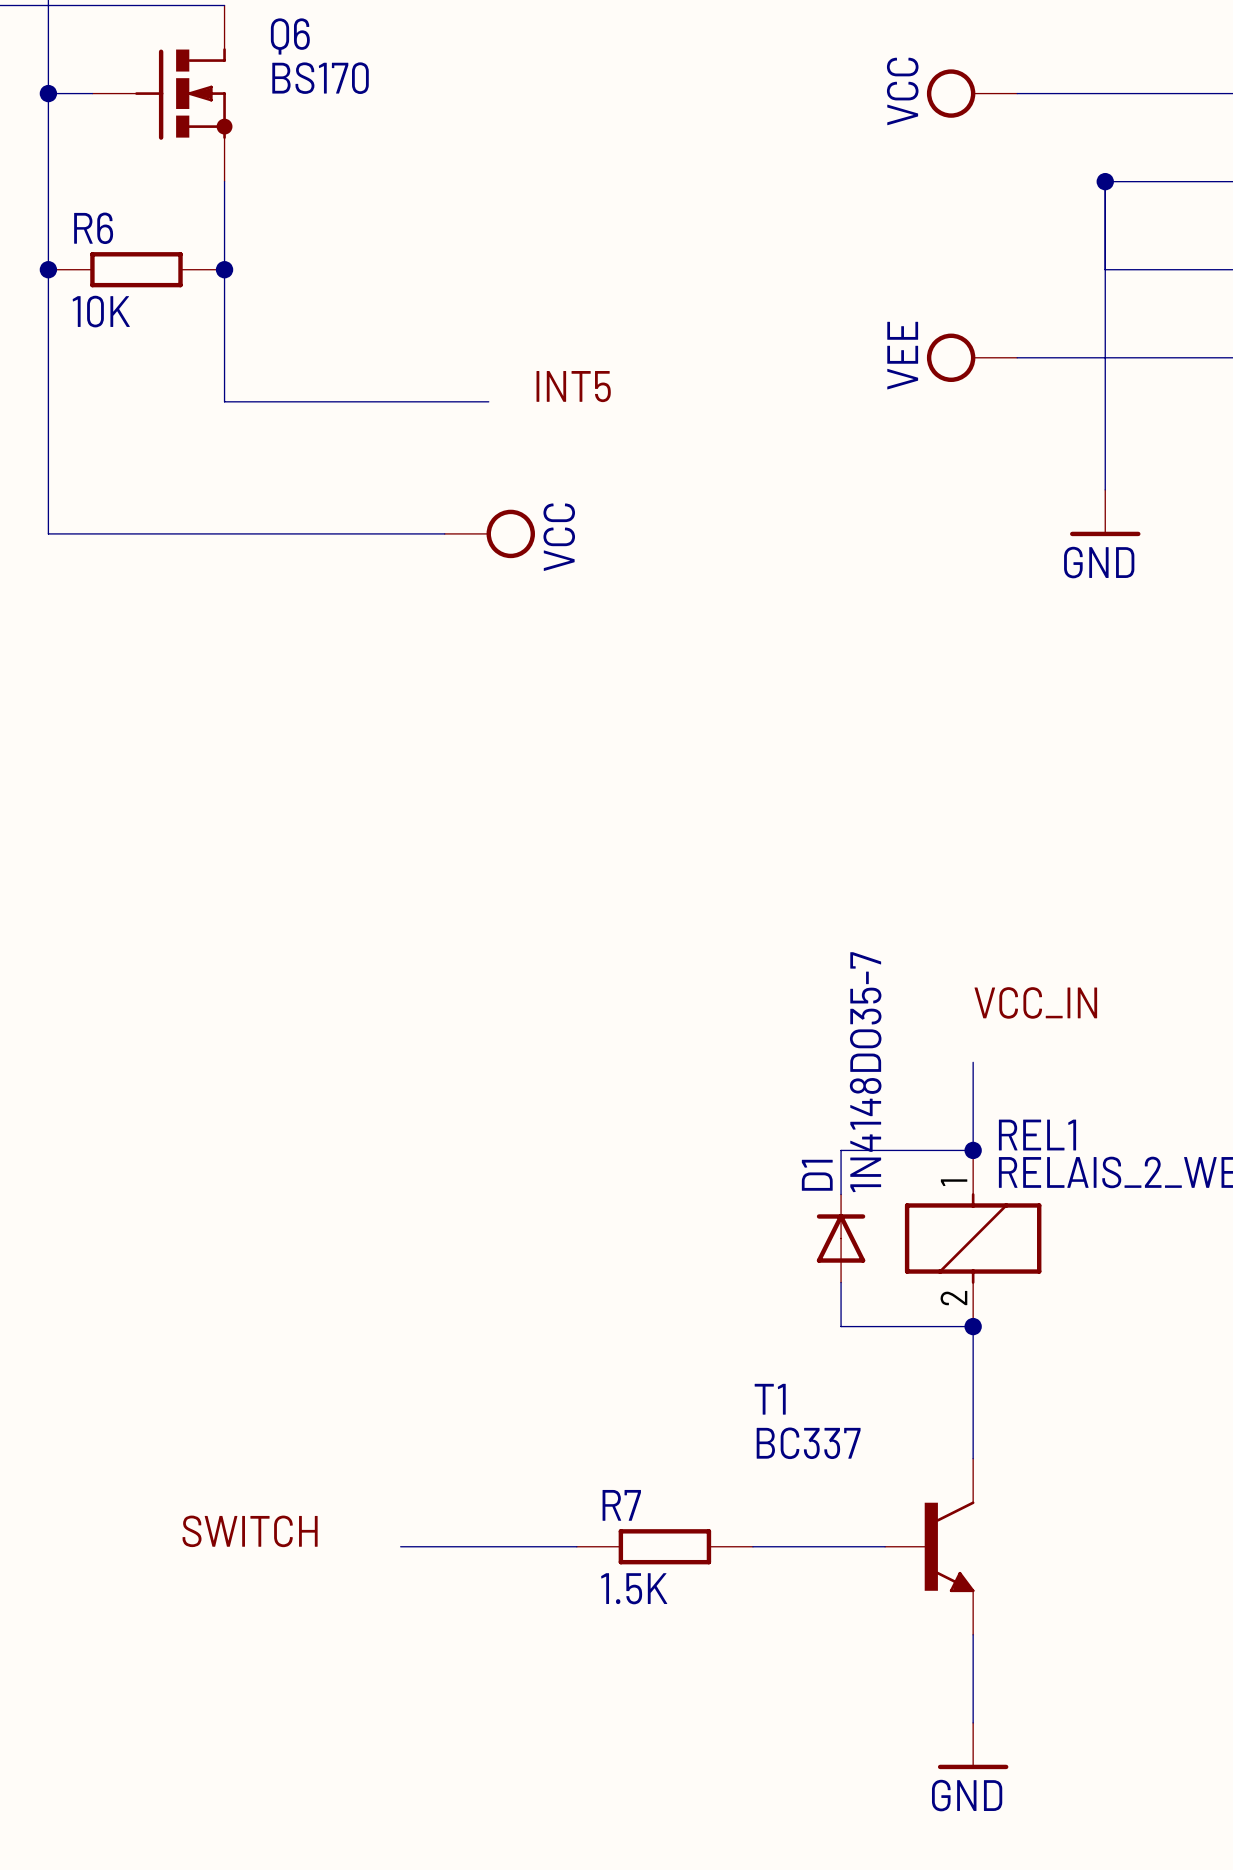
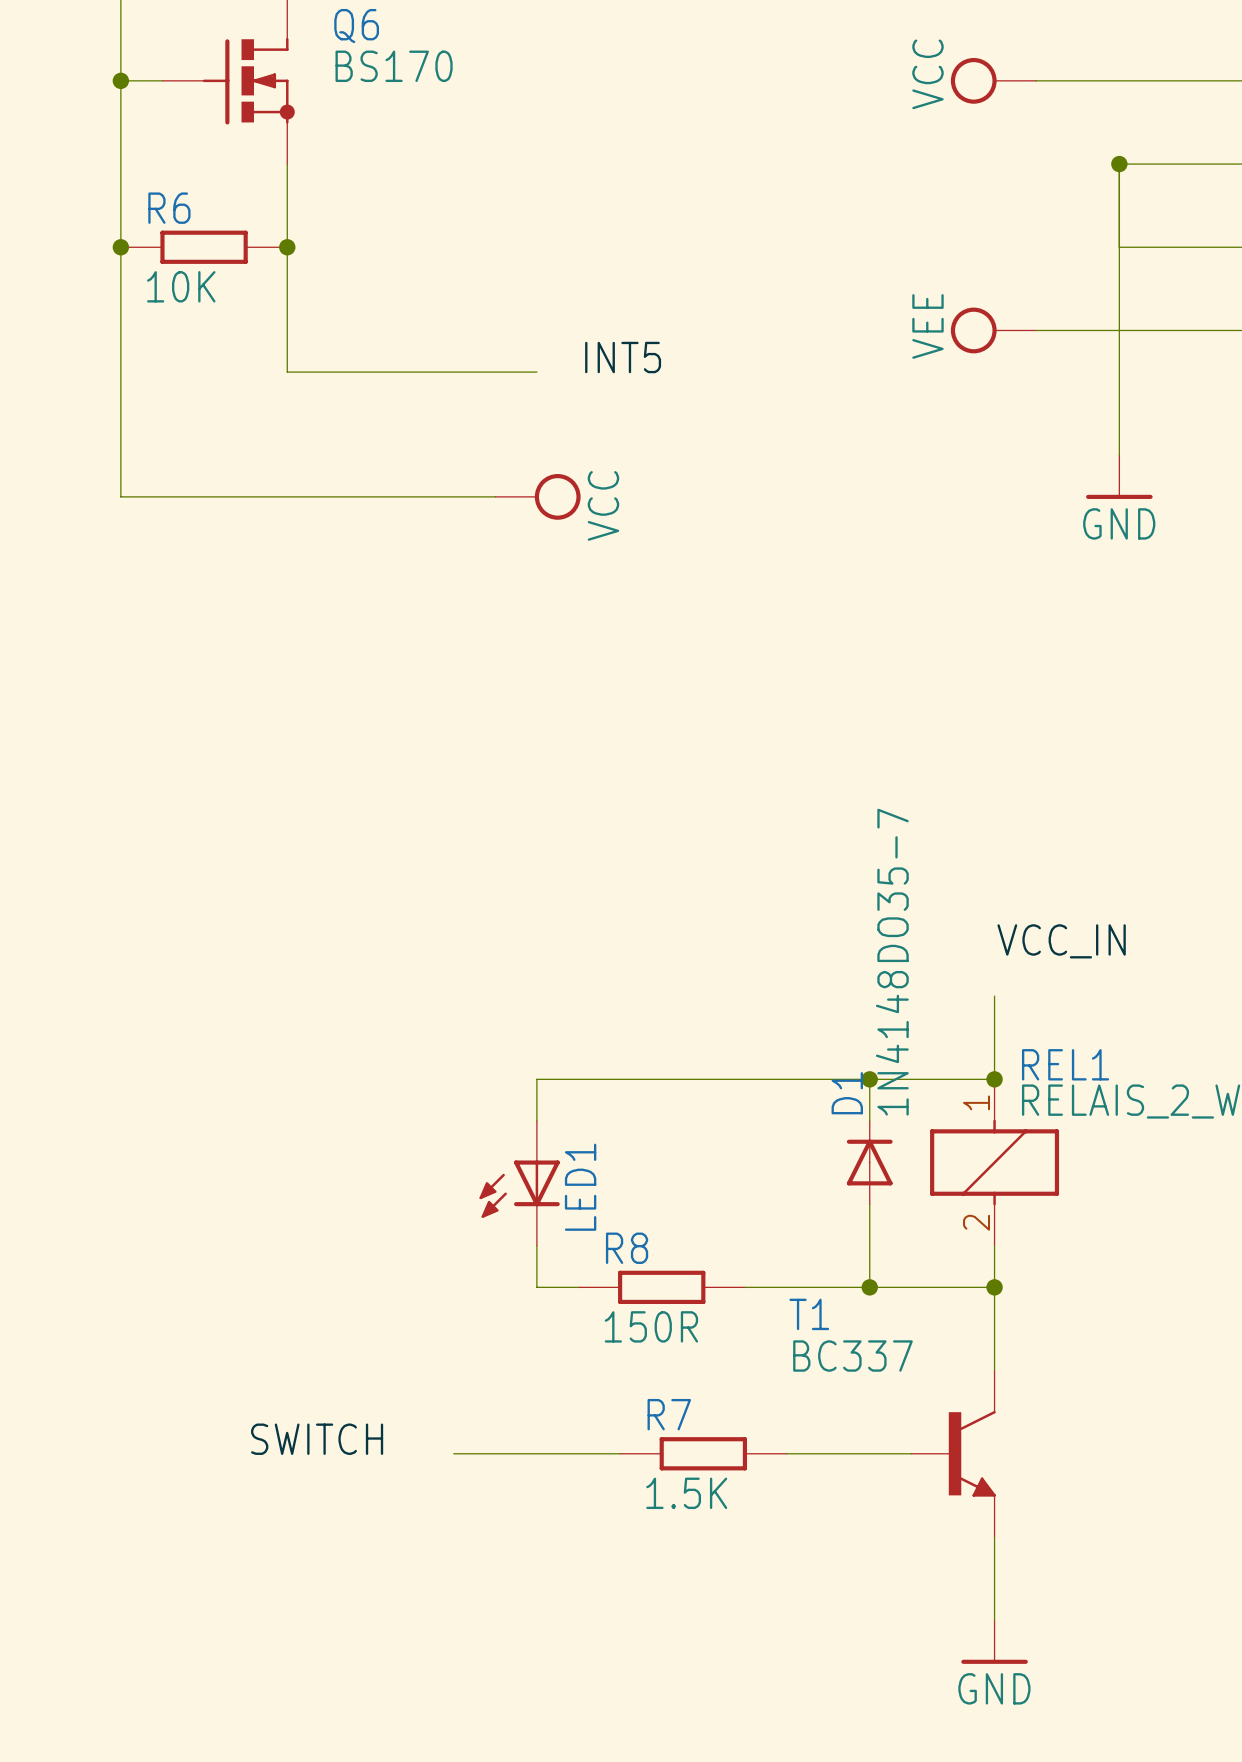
wire: none -> (869, 1079) (536, 1079) (536, 1120)
junction: none -> (869, 1079)
LED1: none -> (519, 1183)
wire: none -> (536, 1245) (536, 1287) (578, 1287)
wire: (841, 1326) (973, 1326) -> (869, 1245) (869, 1287)
junction position: (973, 1326) -> (994, 1287)
R8: none -> 150R (661, 1287)
wire: none -> (744, 1287) (994, 1287)
junction: none -> (869, 1287)

